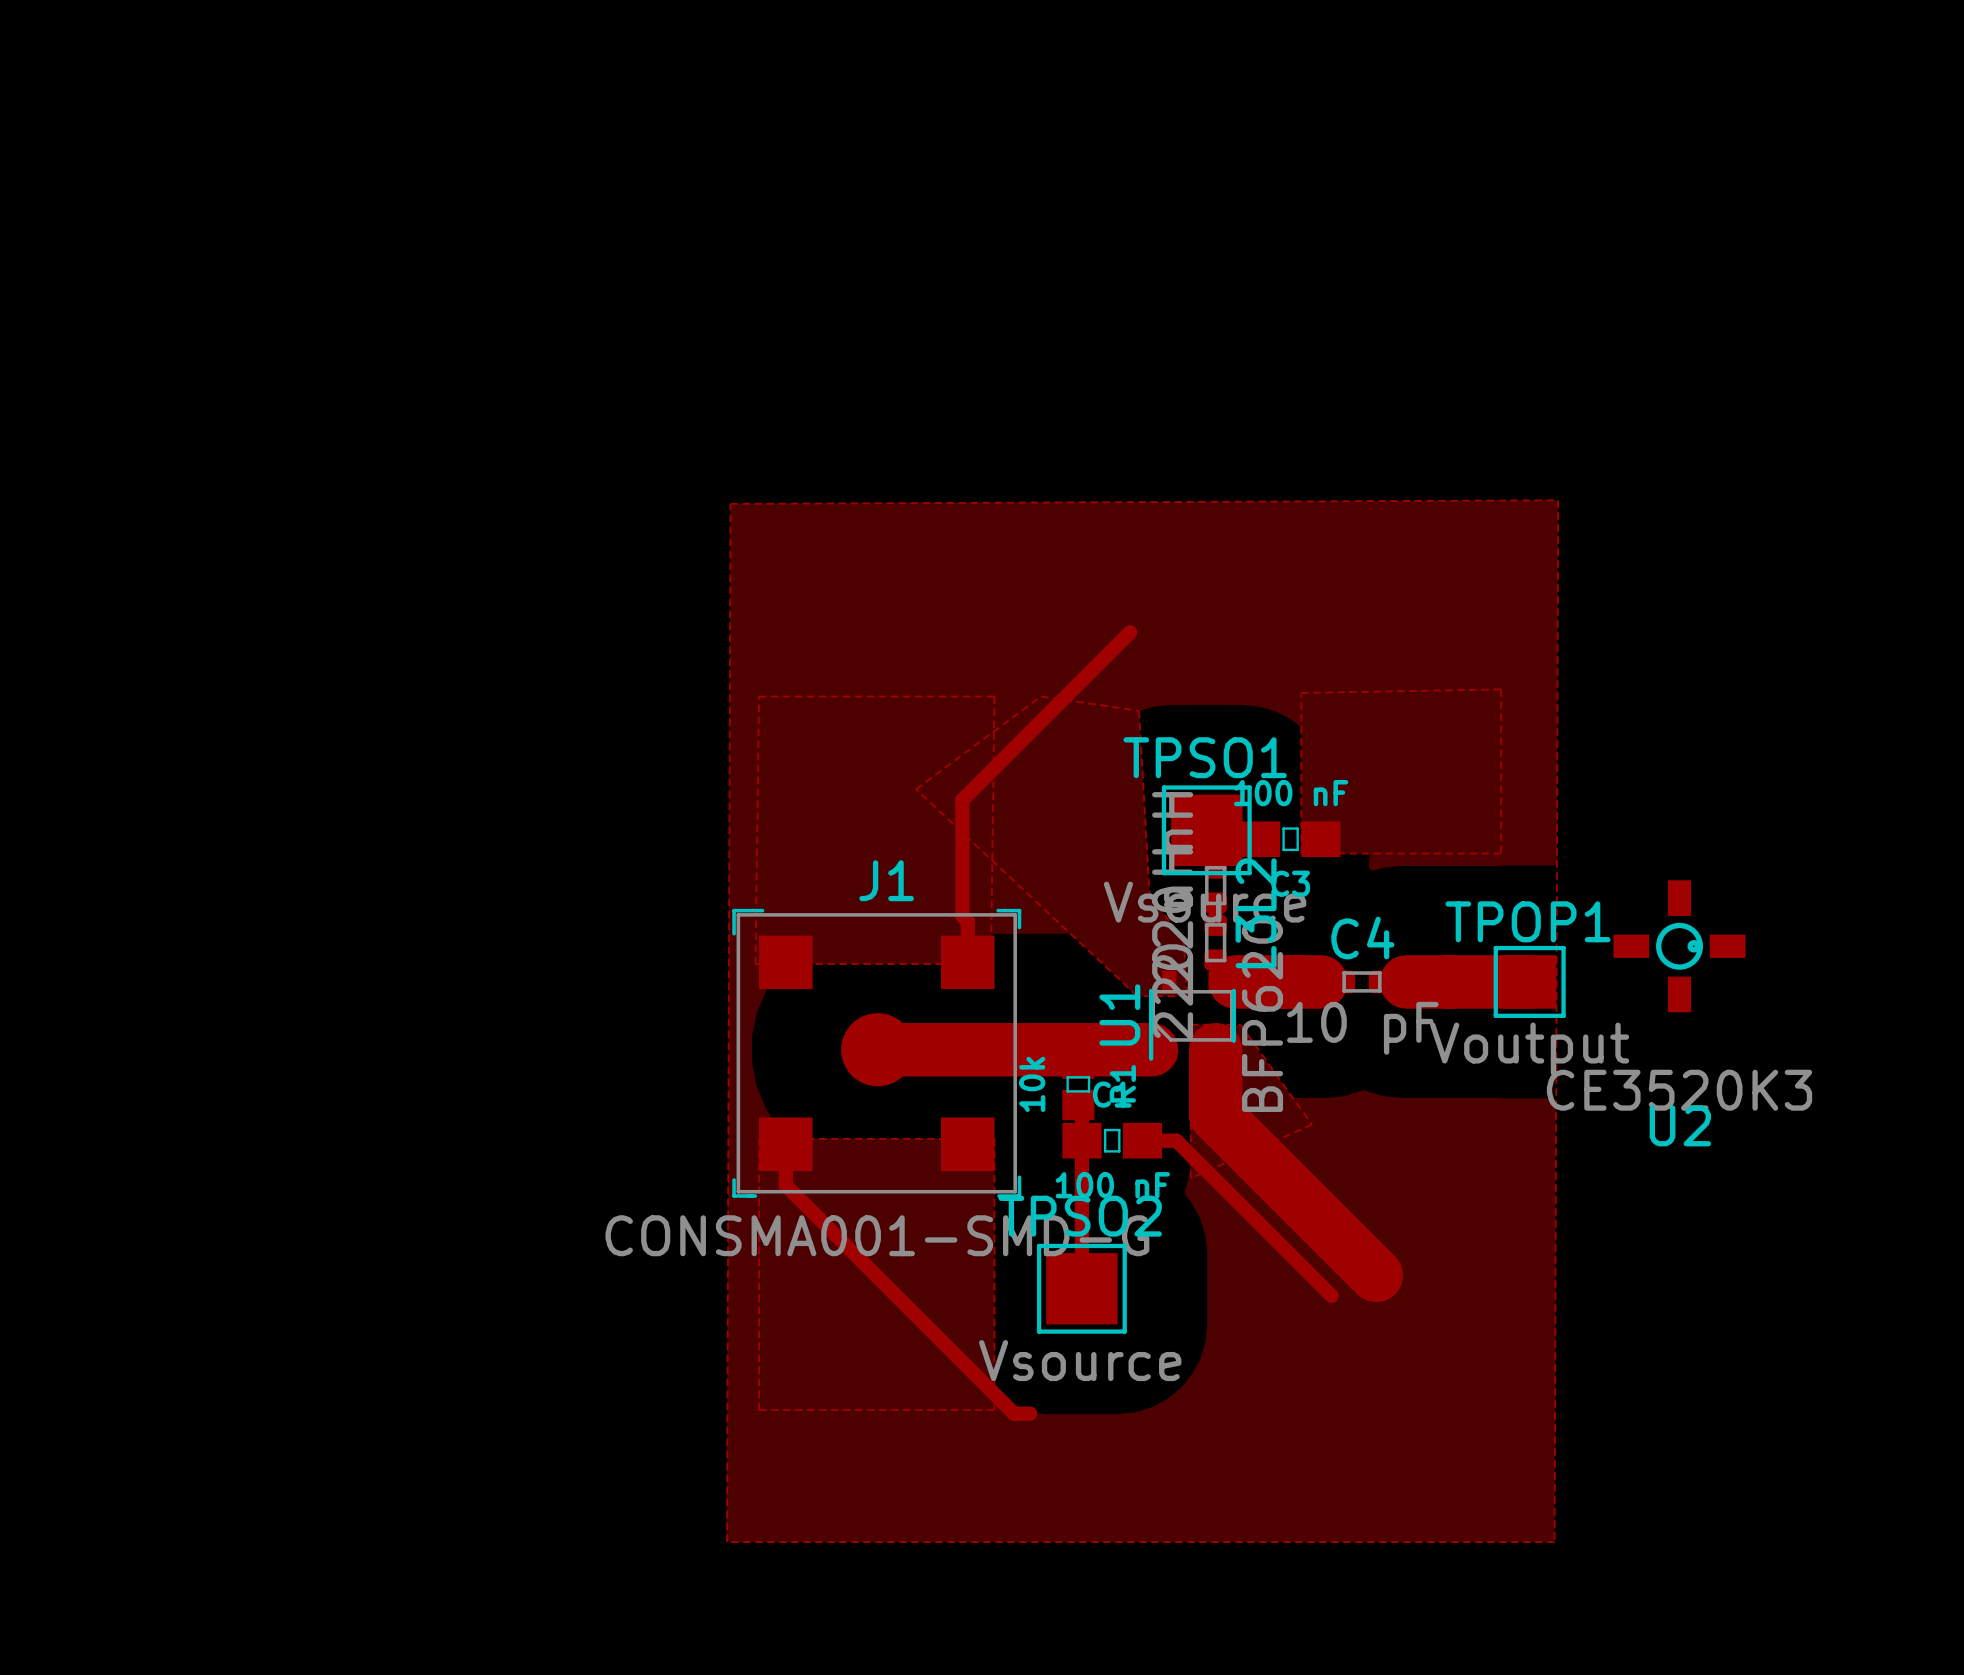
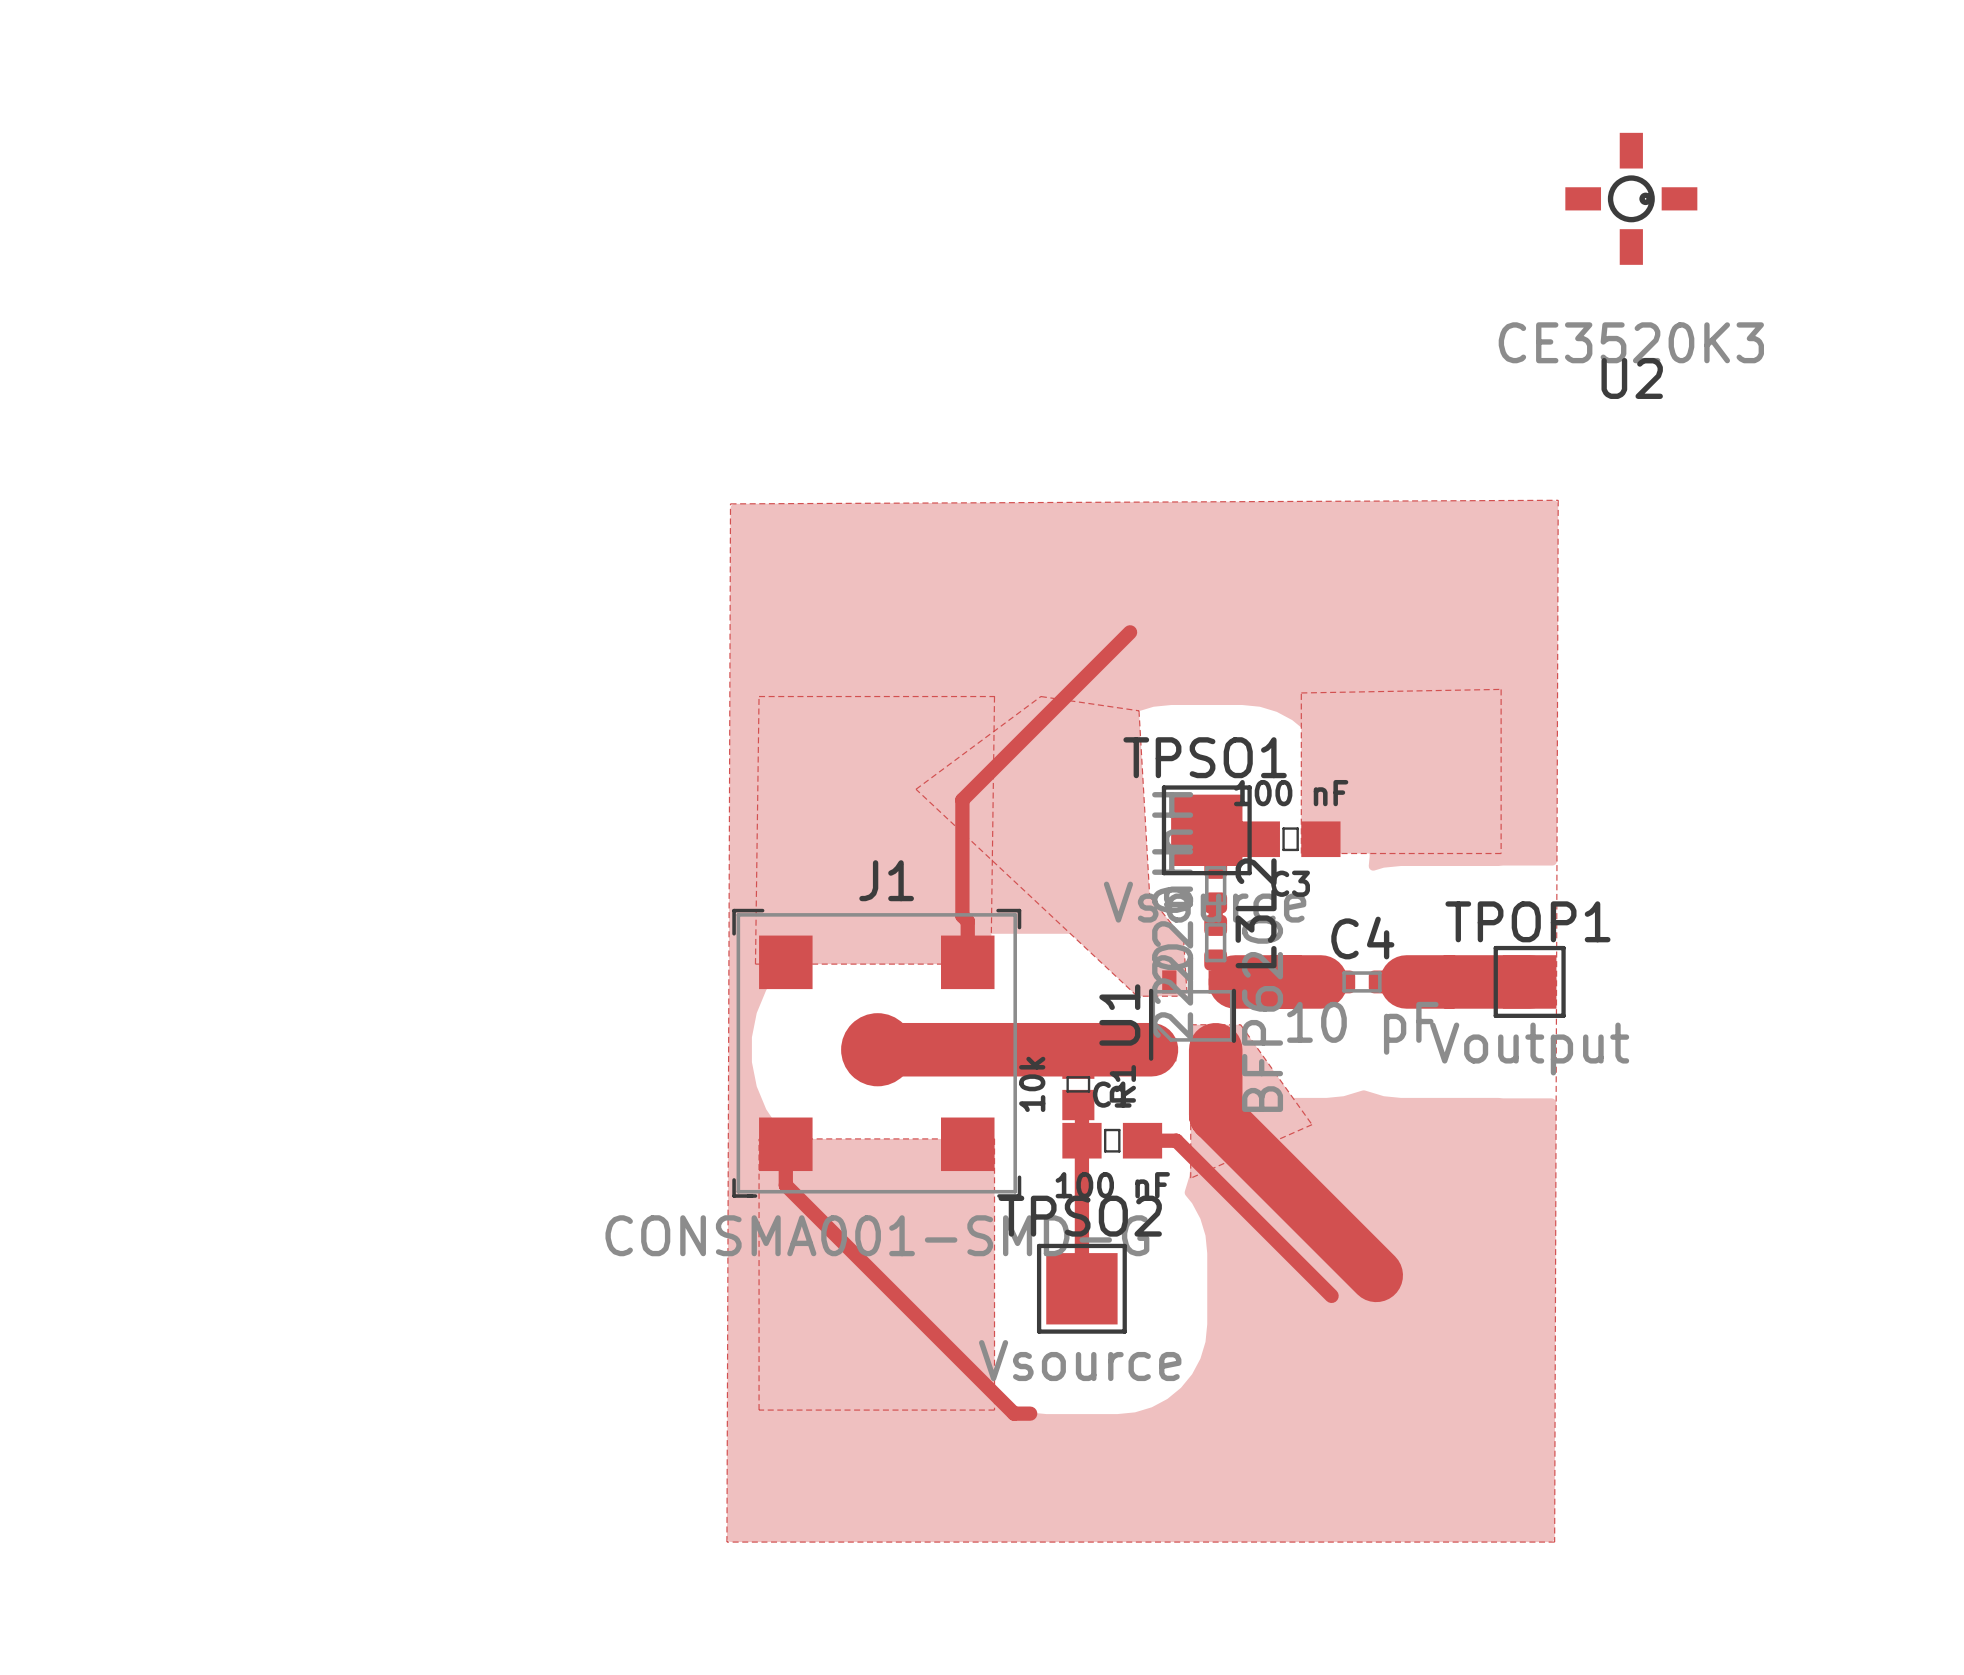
U2 position: (1679, 946) -> (1631, 198)

